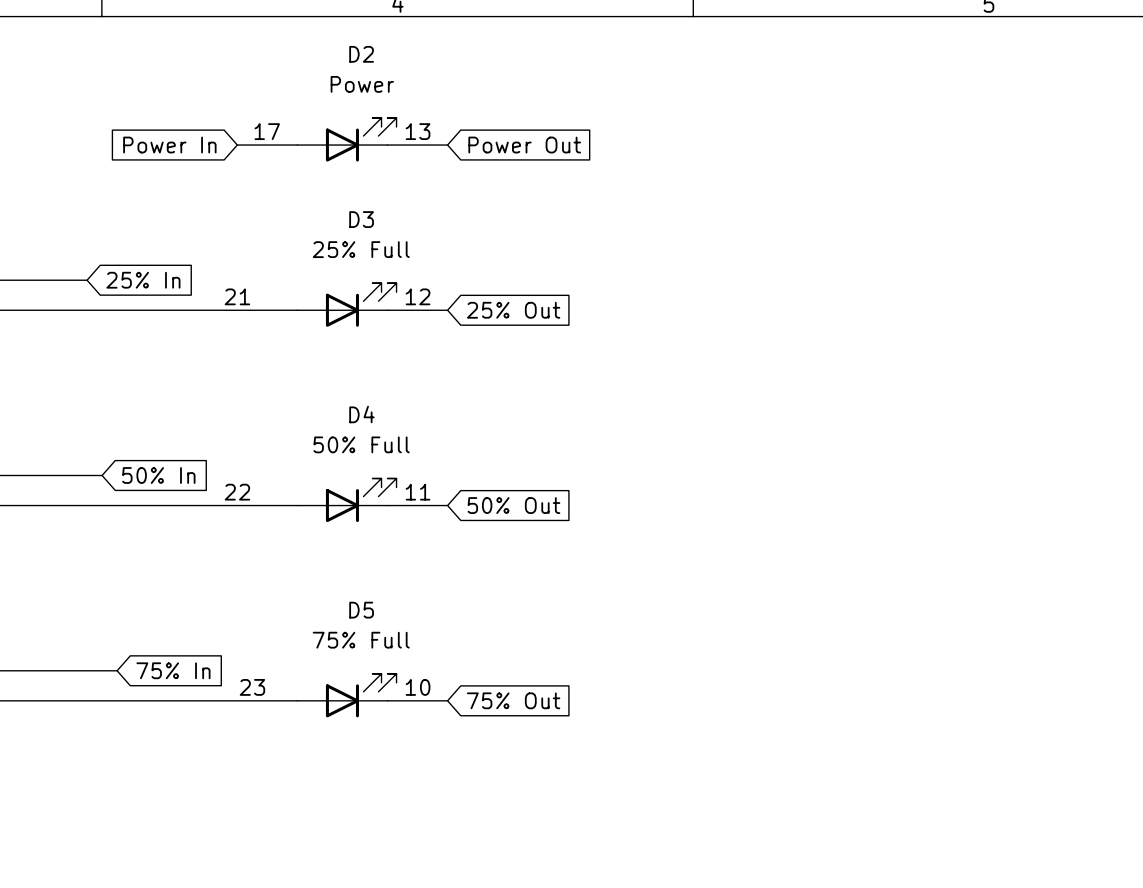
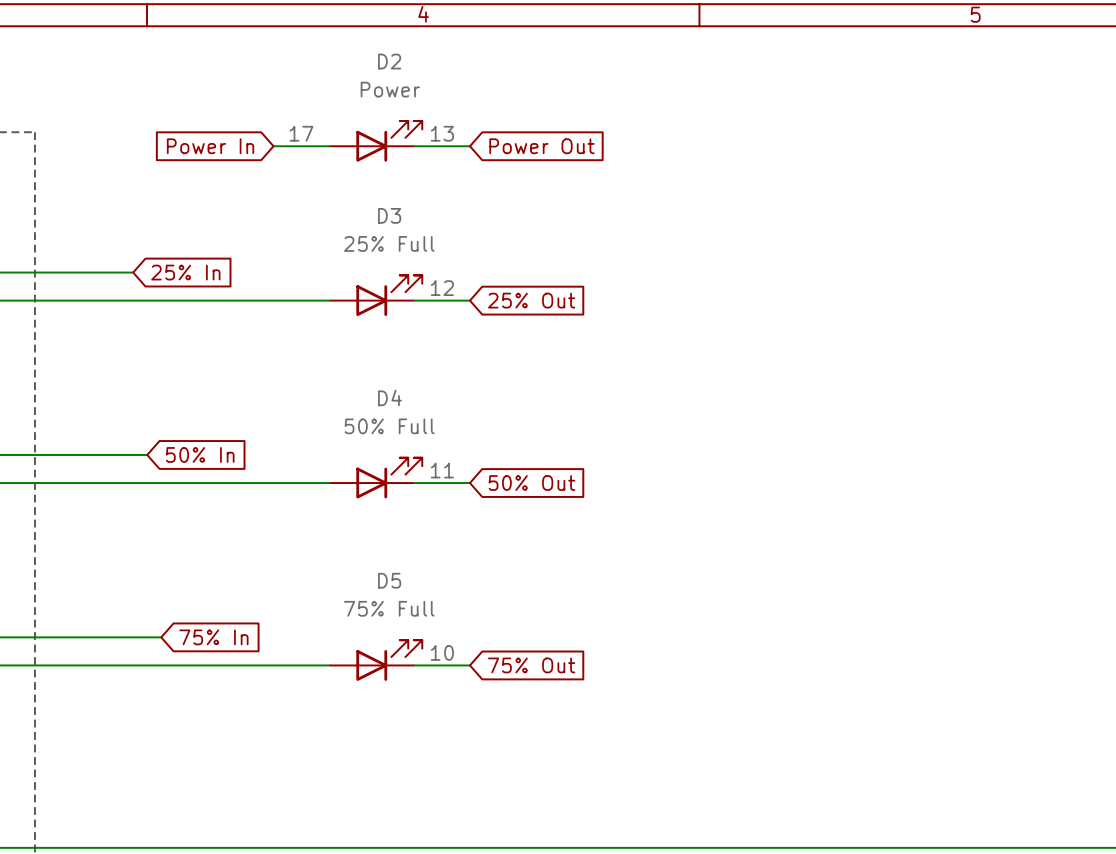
label: 21 (237, 296) -> none
label: 22 (237, 492) -> none
label: 23 (252, 687) -> none

